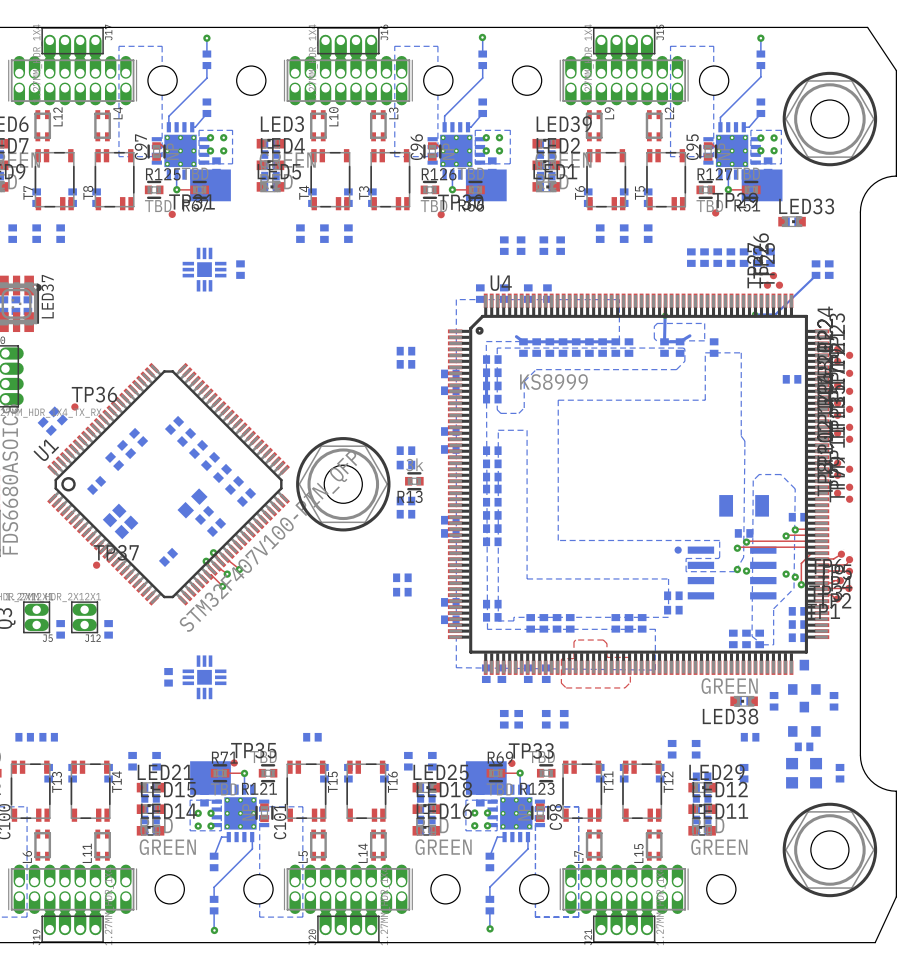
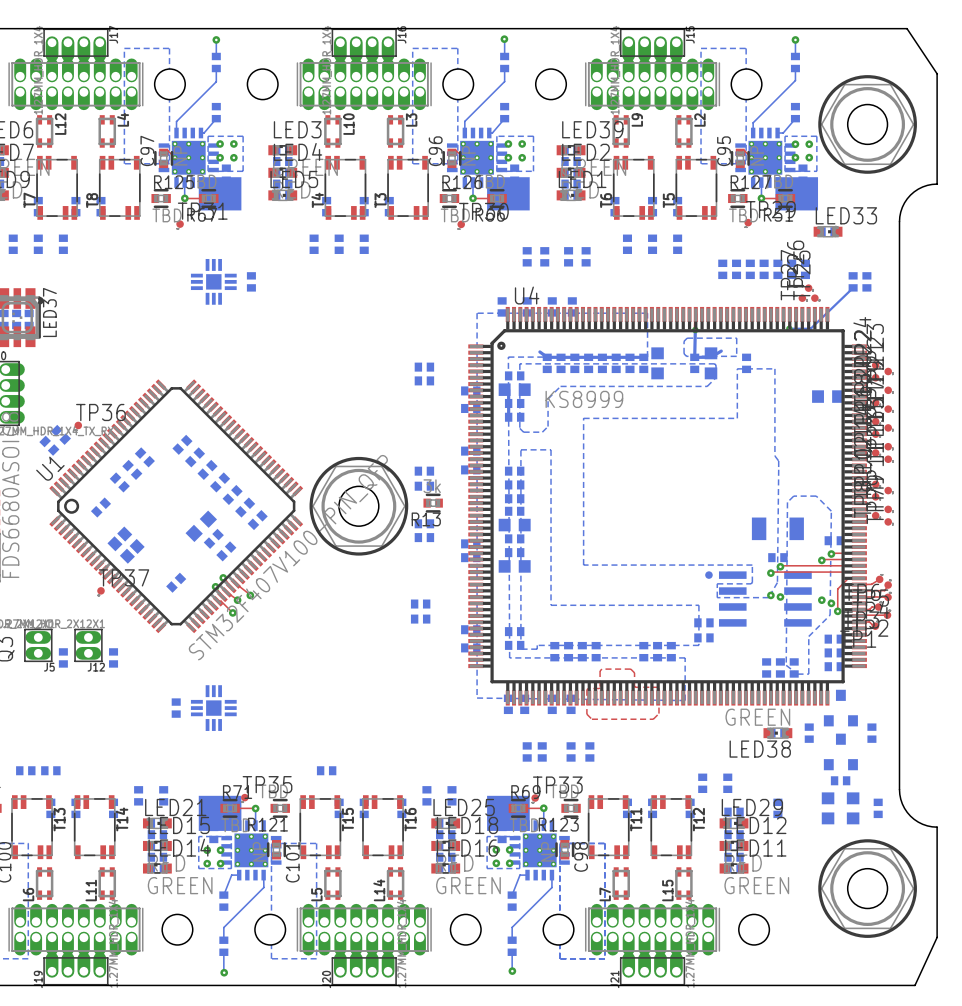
part footprint: [624, 338, 634, 357] -> [651, 347, 664, 380]
part footprint: [675, 338, 685, 357] -> [704, 347, 718, 380]
part footprint: [483, 368, 502, 378] -> [498, 383, 531, 396]
part footprint: [782, 375, 802, 384] -> [812, 390, 845, 403]
part footprint: [483, 497, 502, 507] -> [498, 518, 531, 532]
part footprint: [483, 537, 502, 547] -> [498, 560, 531, 573]
part: (750, 737) -> none

